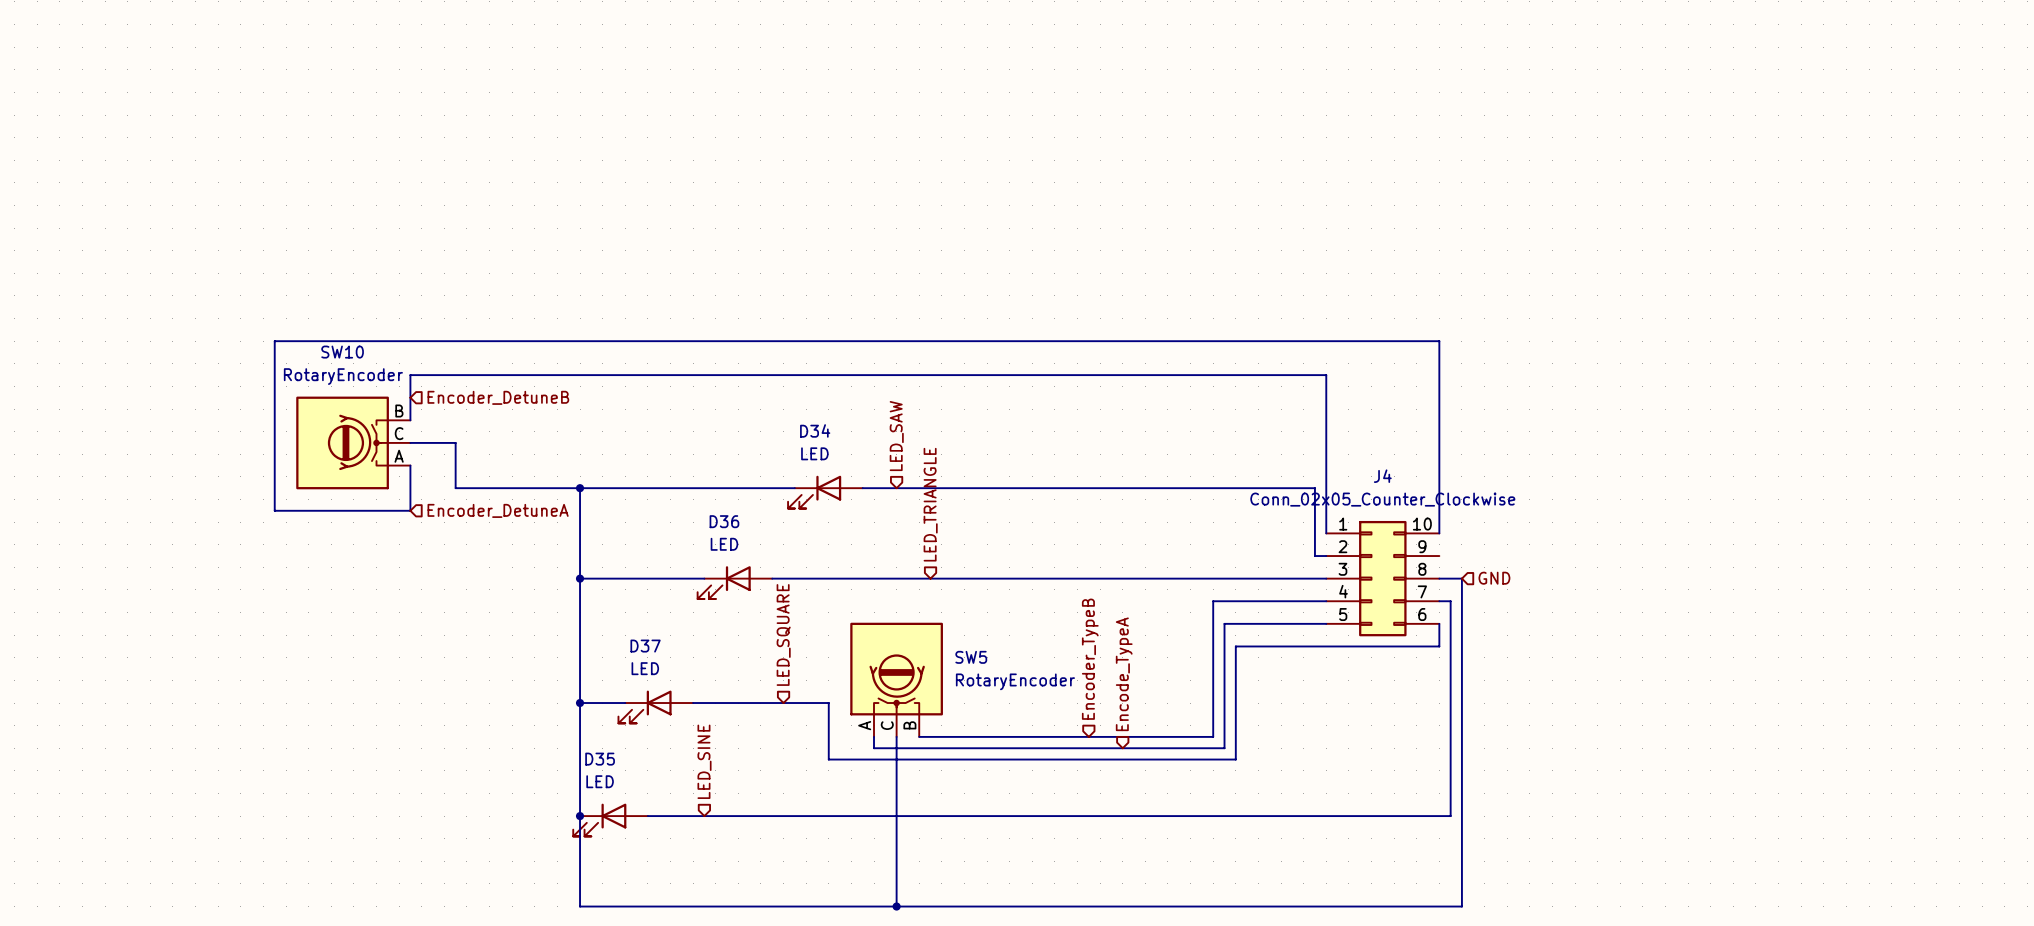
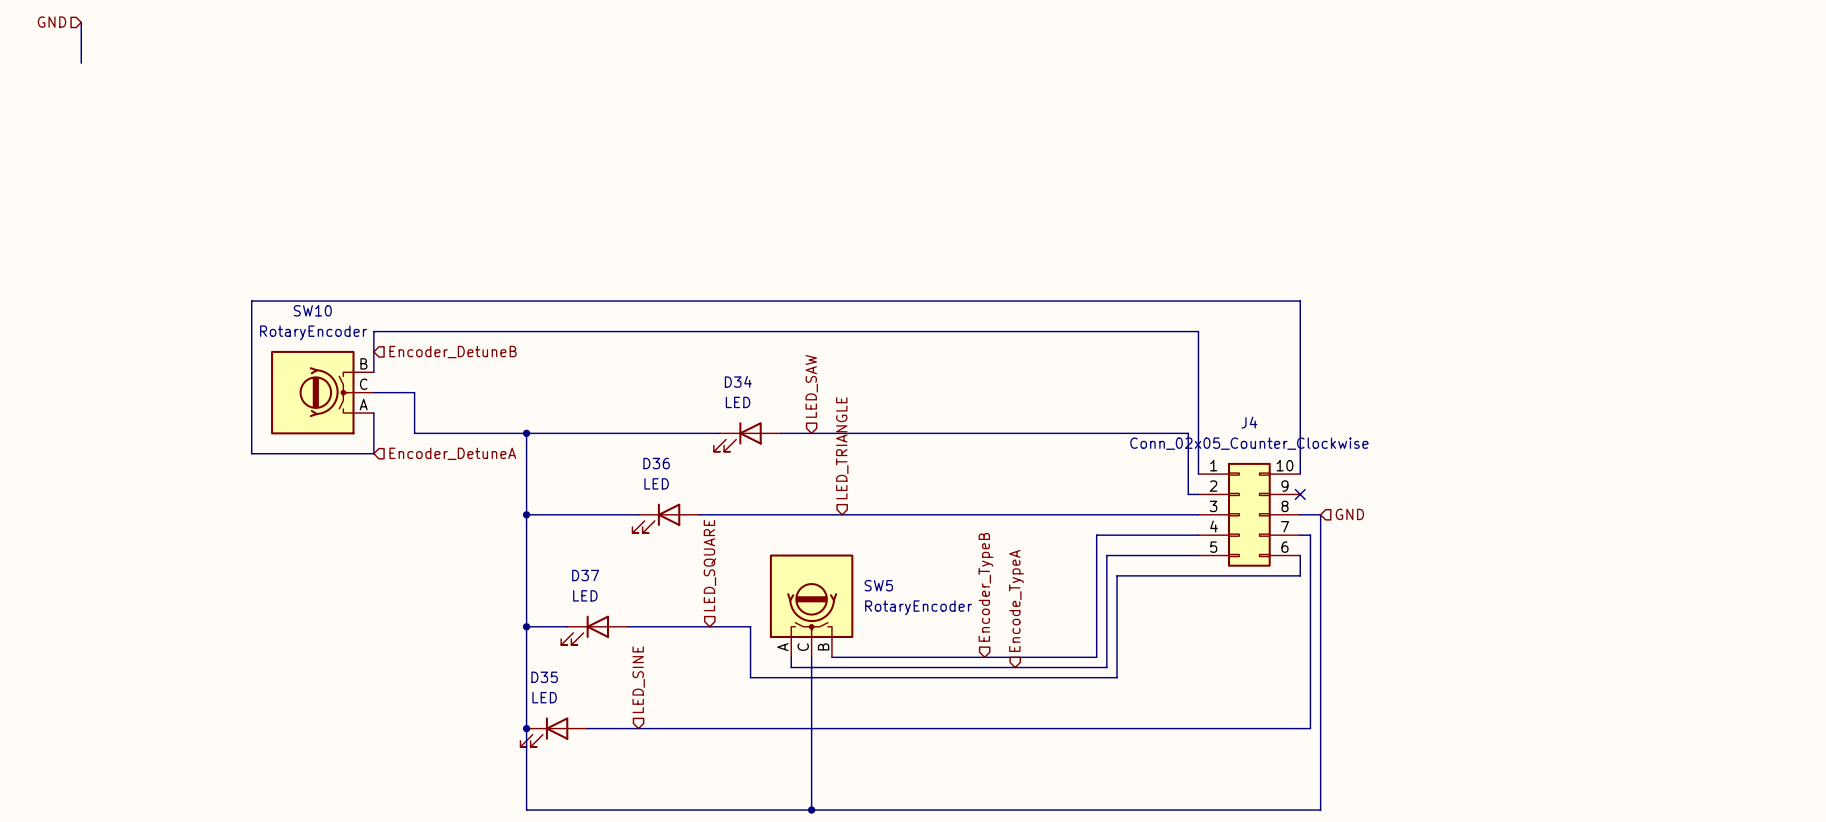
hierarchical label: none -> GND (52, 22)
wire: none -> (81, 22) (81, 63)
no-connect mark: none -> (1300, 494)

